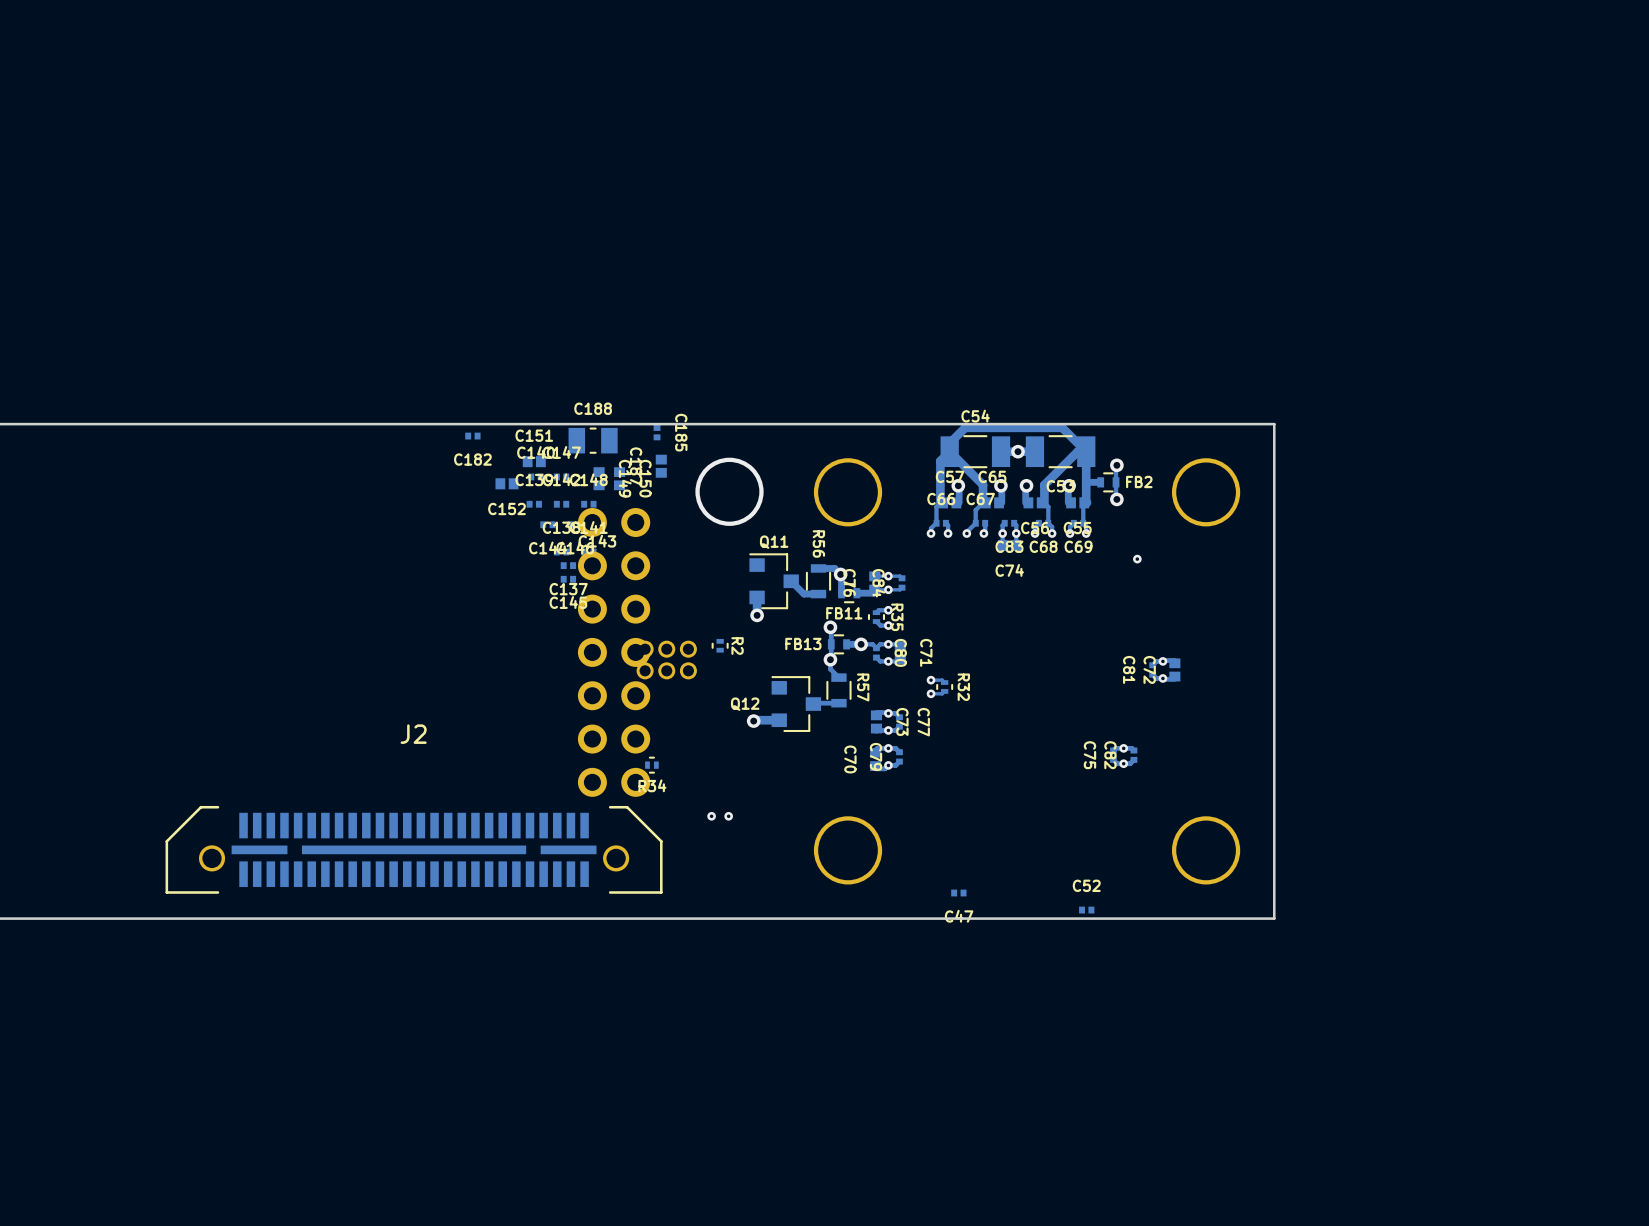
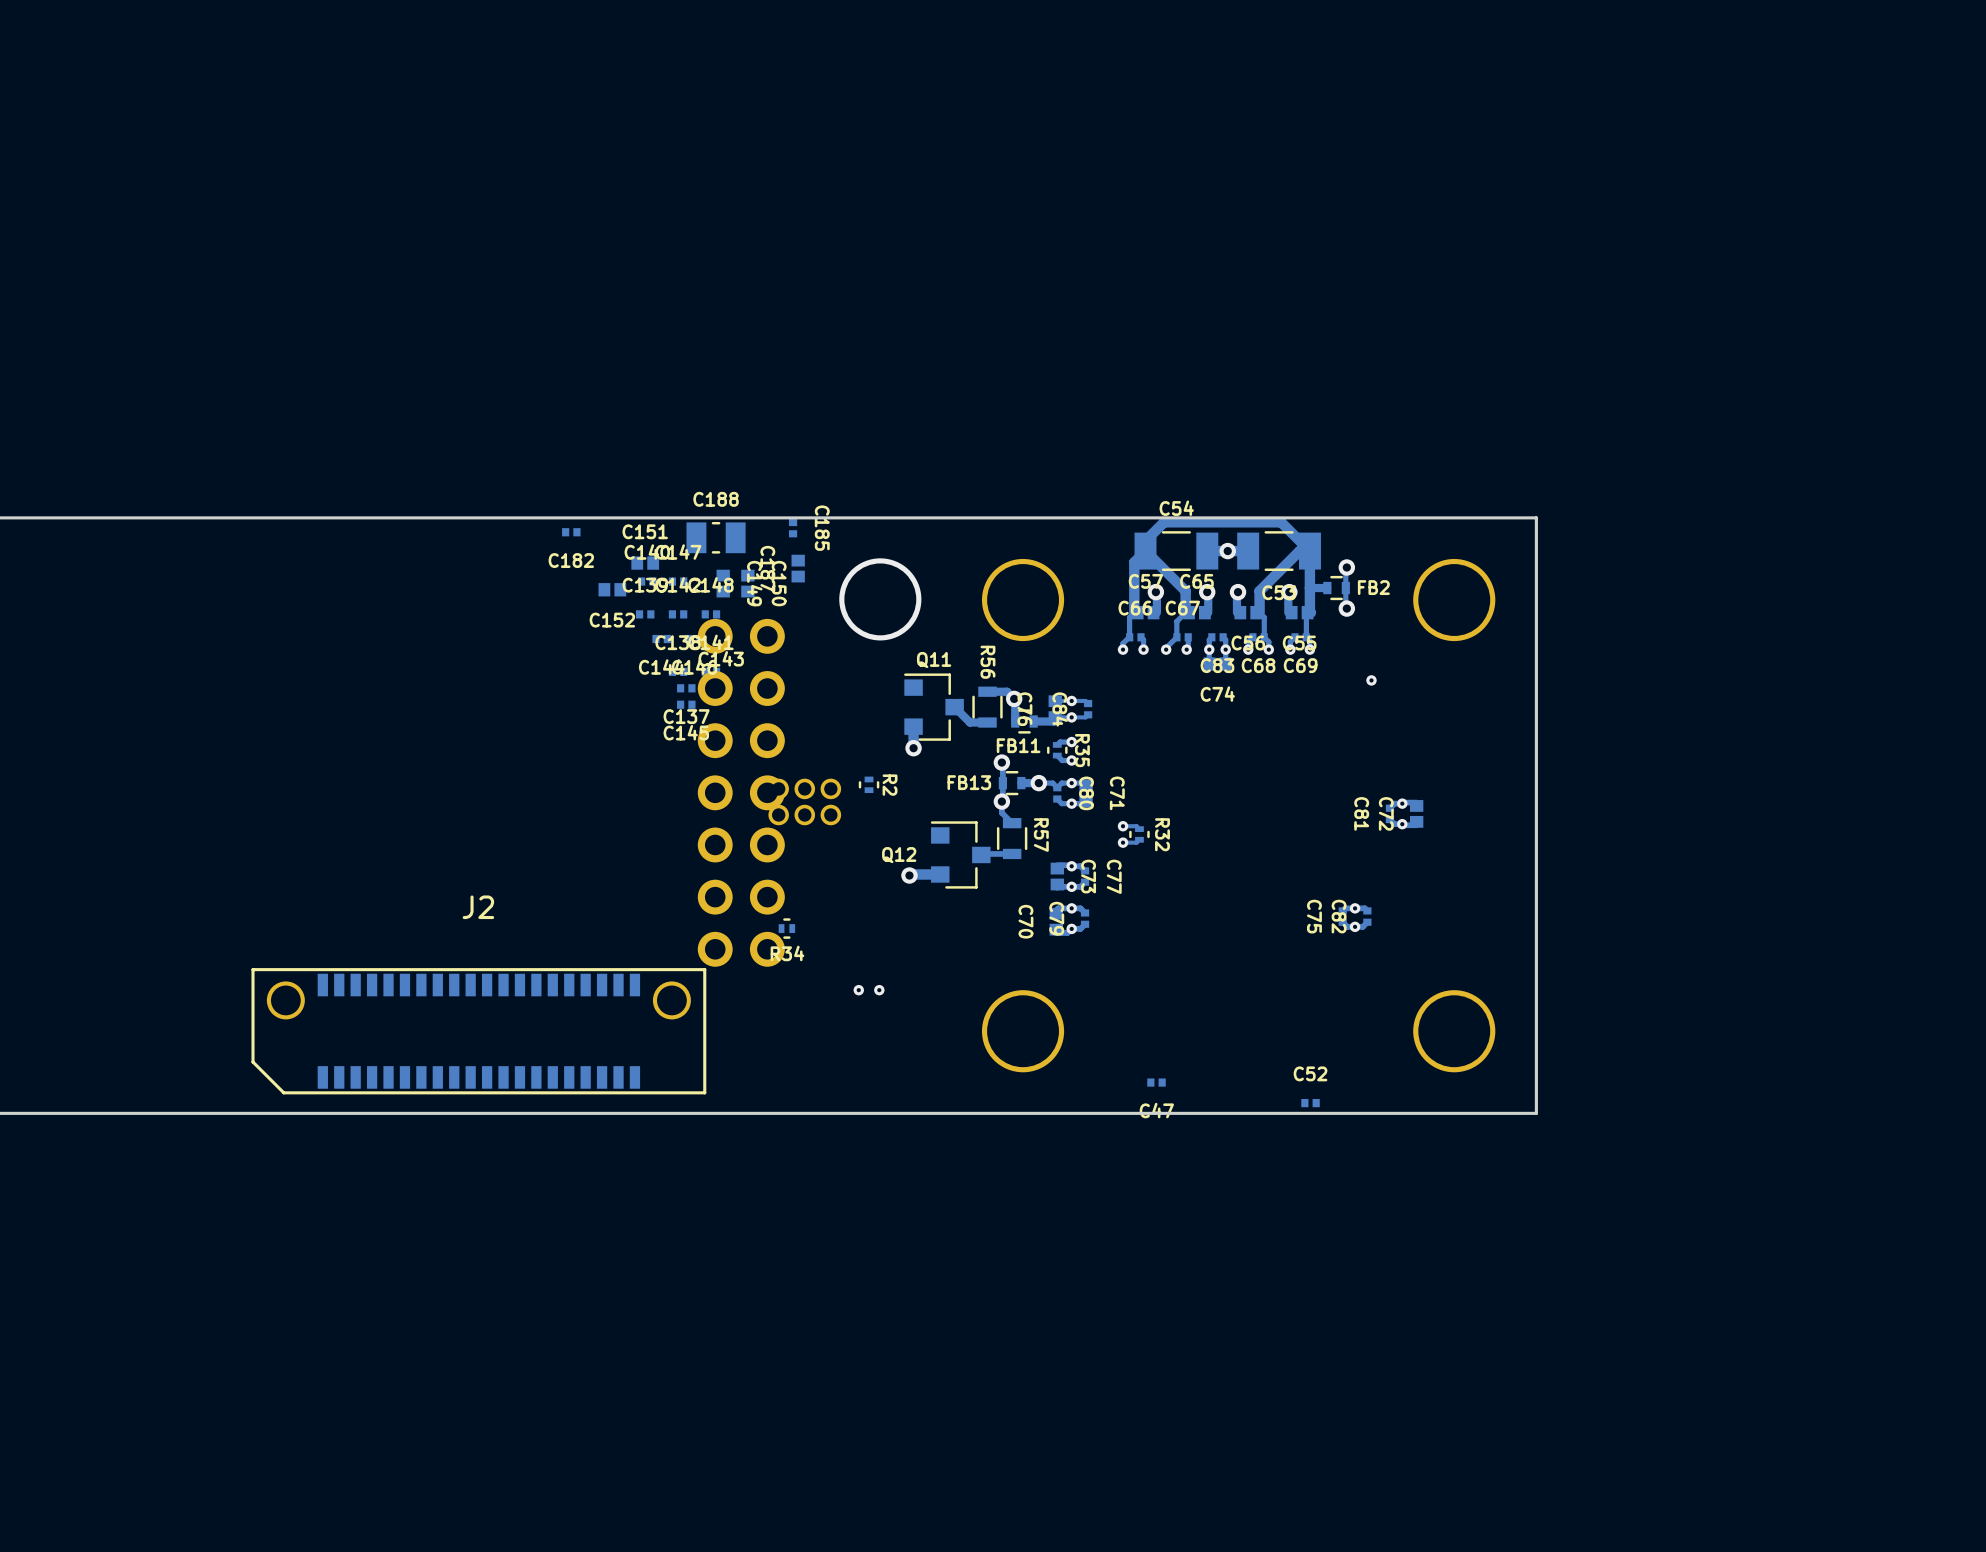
J2 footprint: [165, 805, 663, 894] -> [251, 968, 707, 1095]

